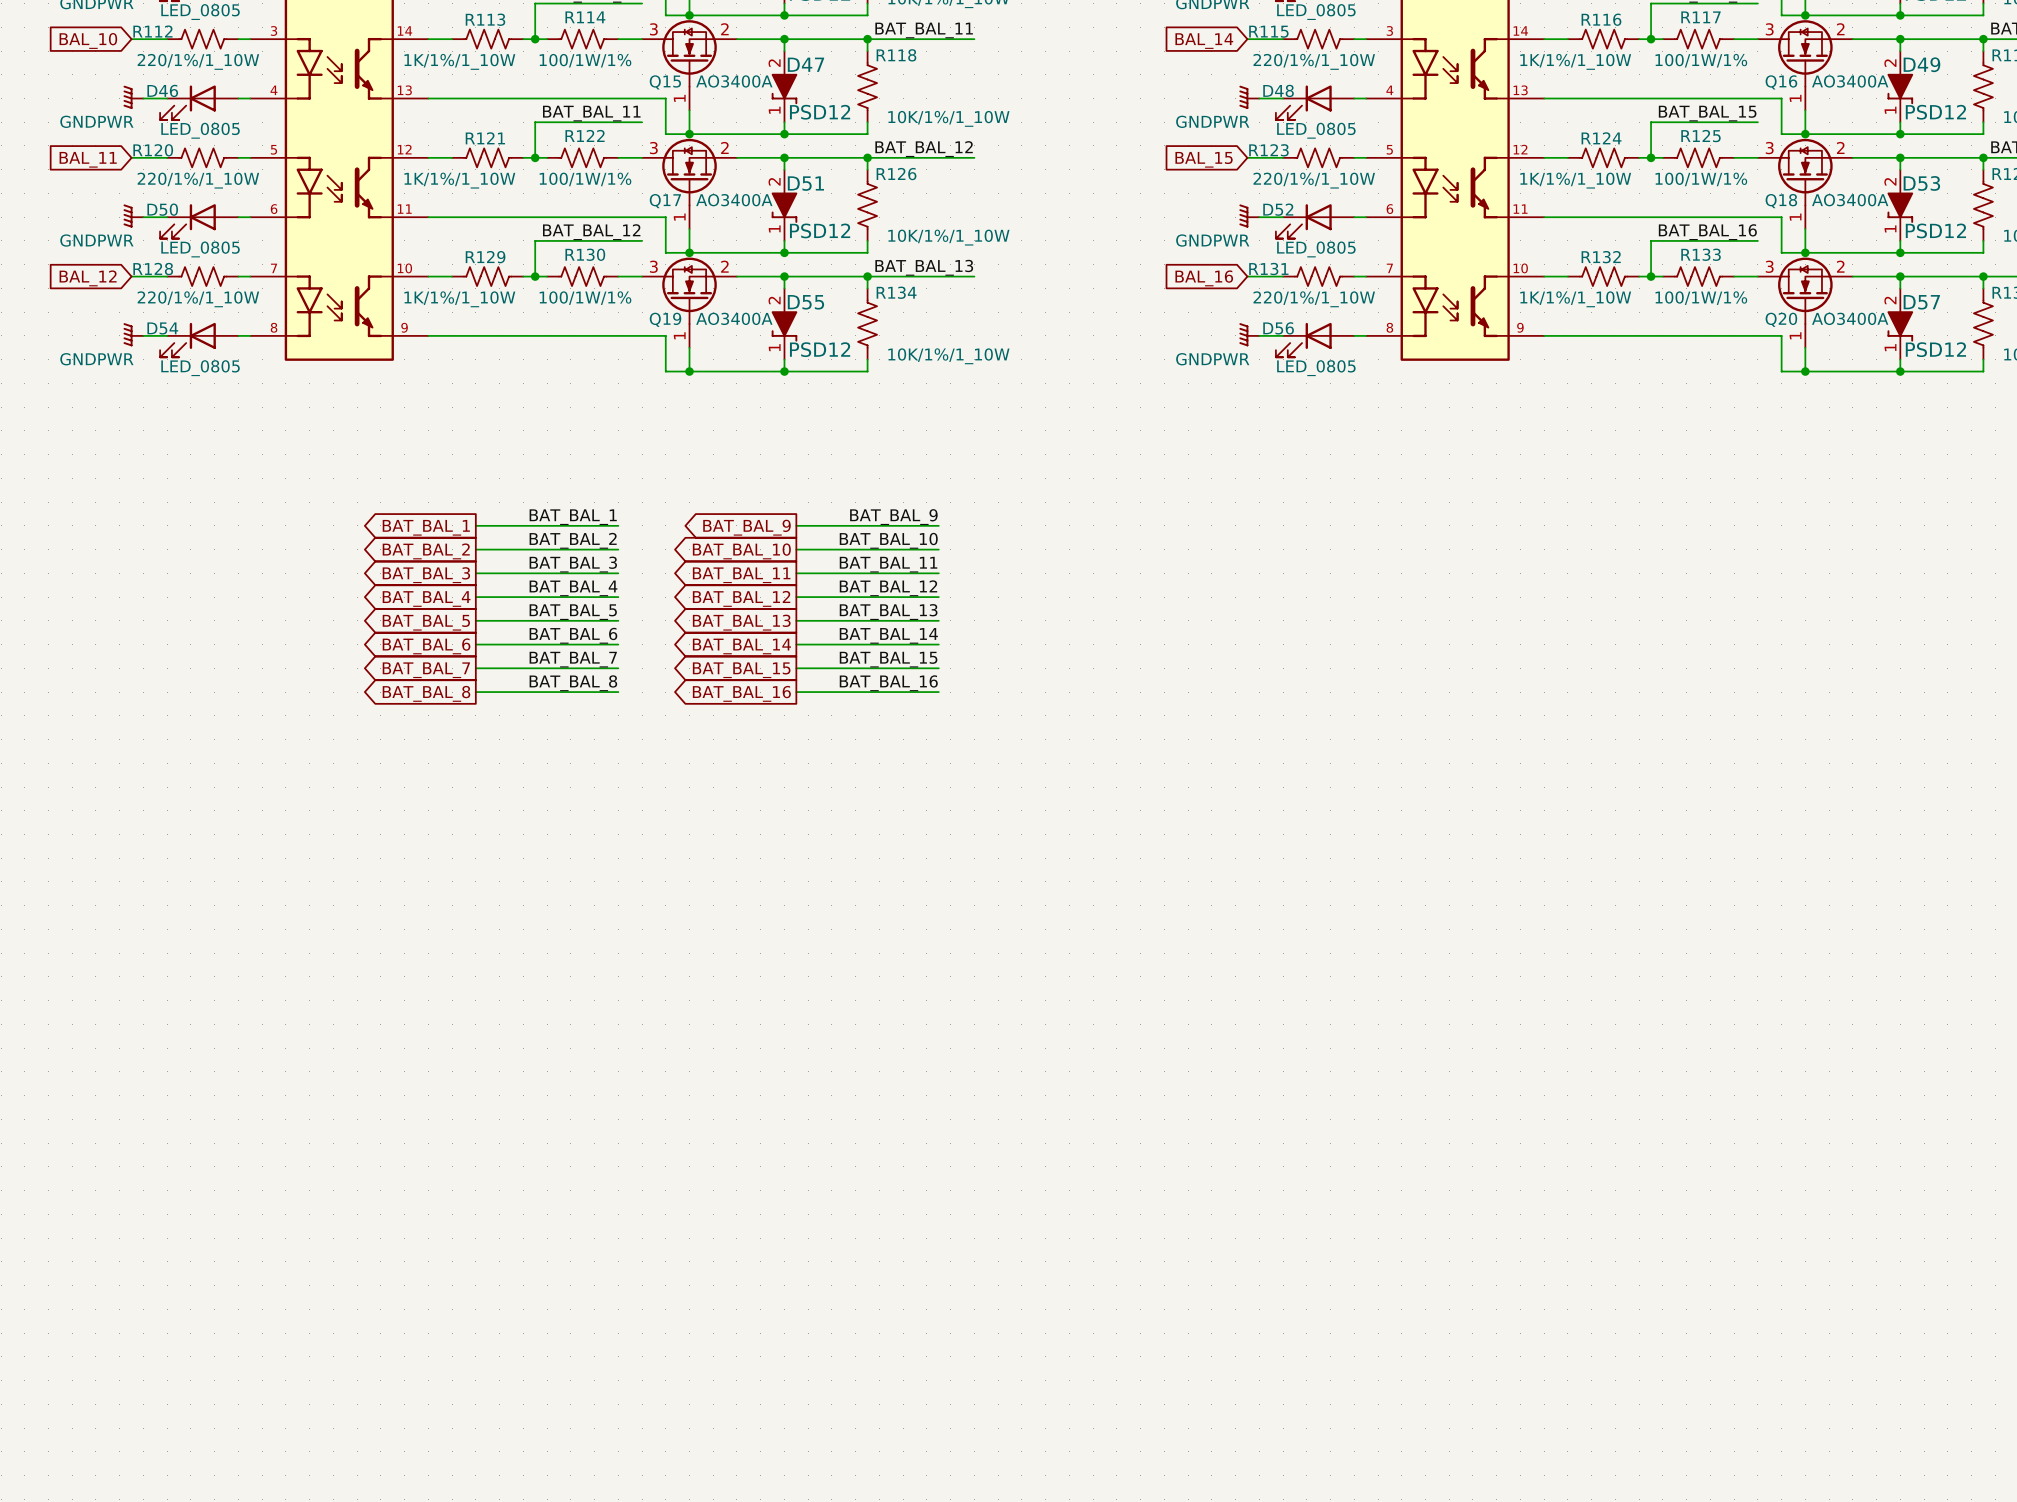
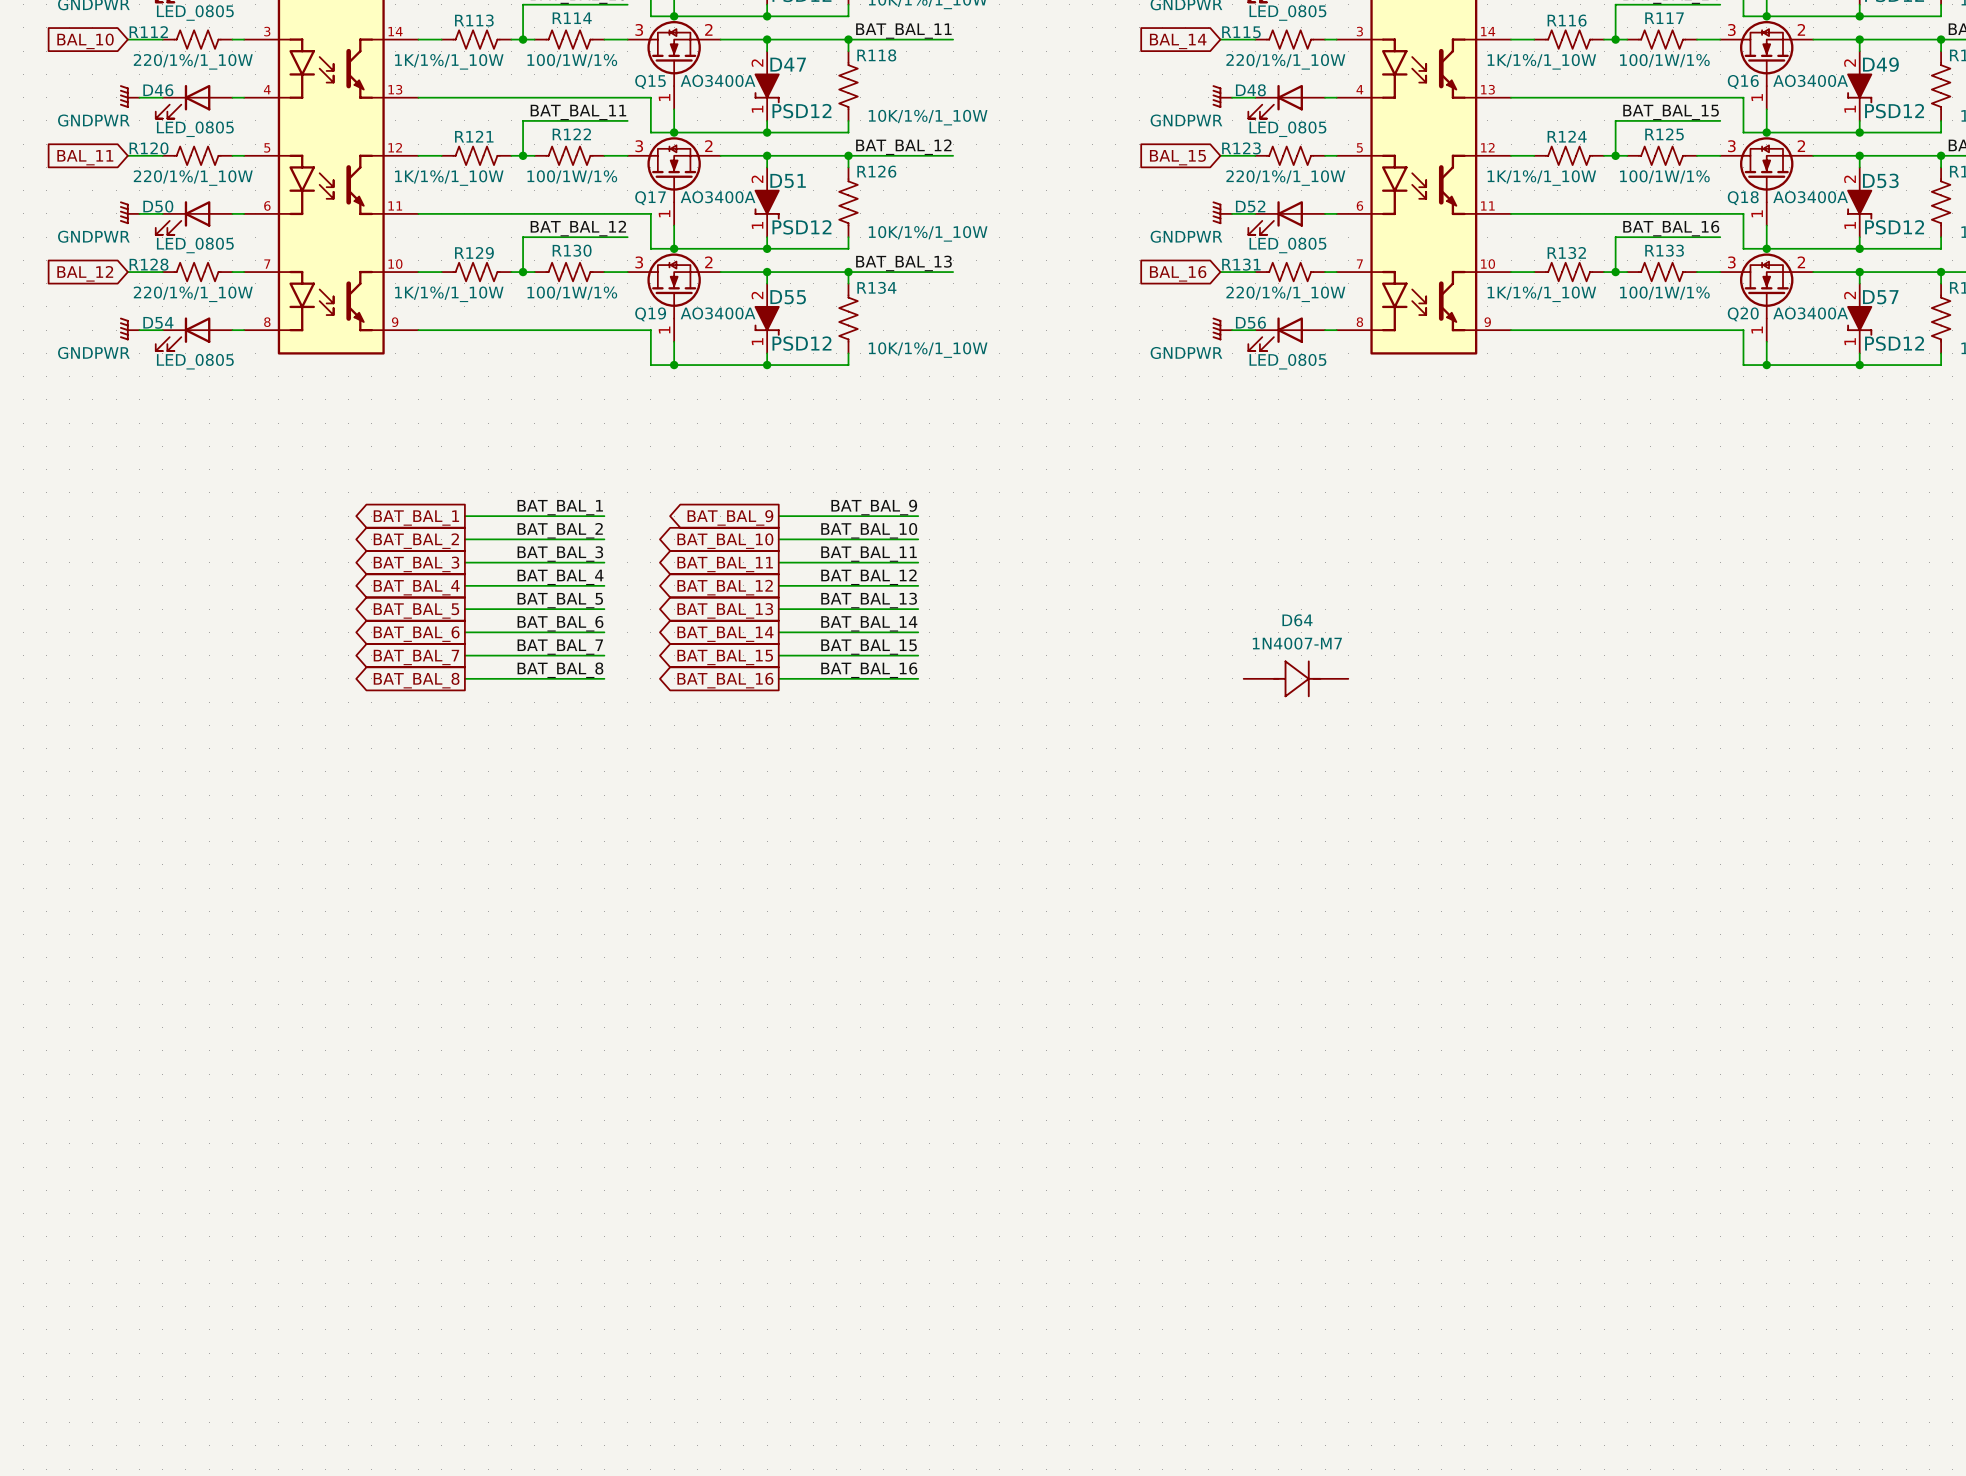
D64: none -> 1N4007-M7 (1295, 678)

